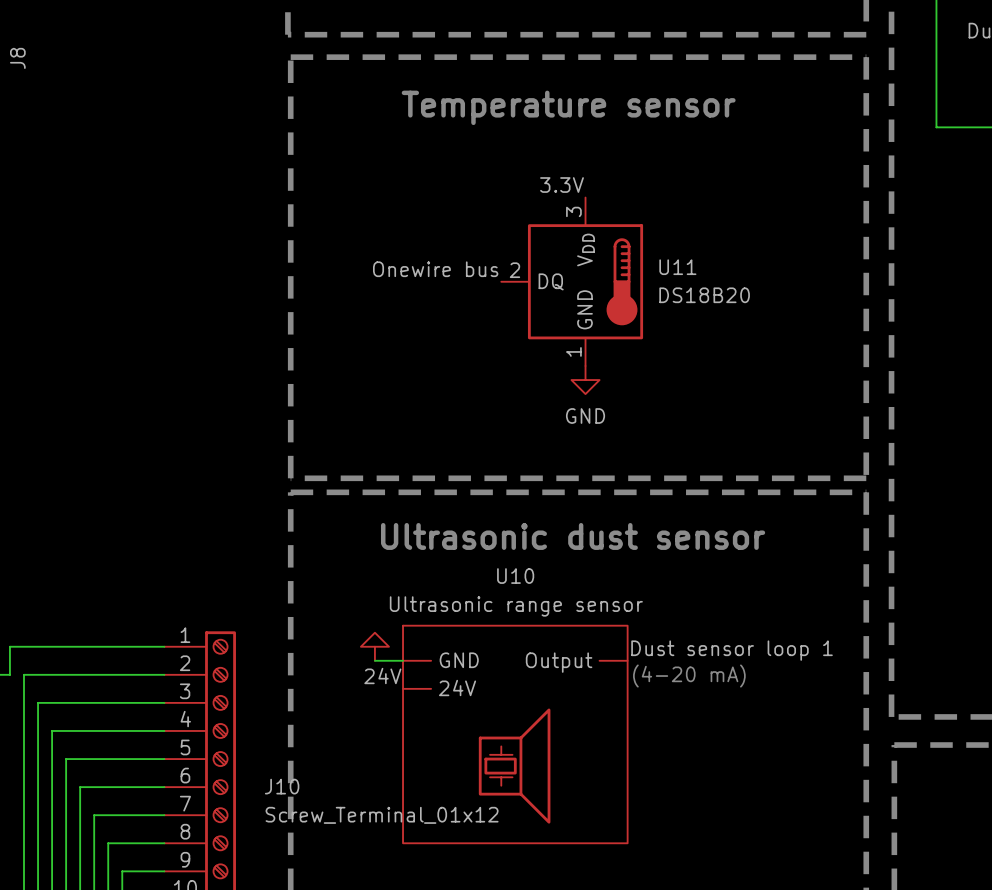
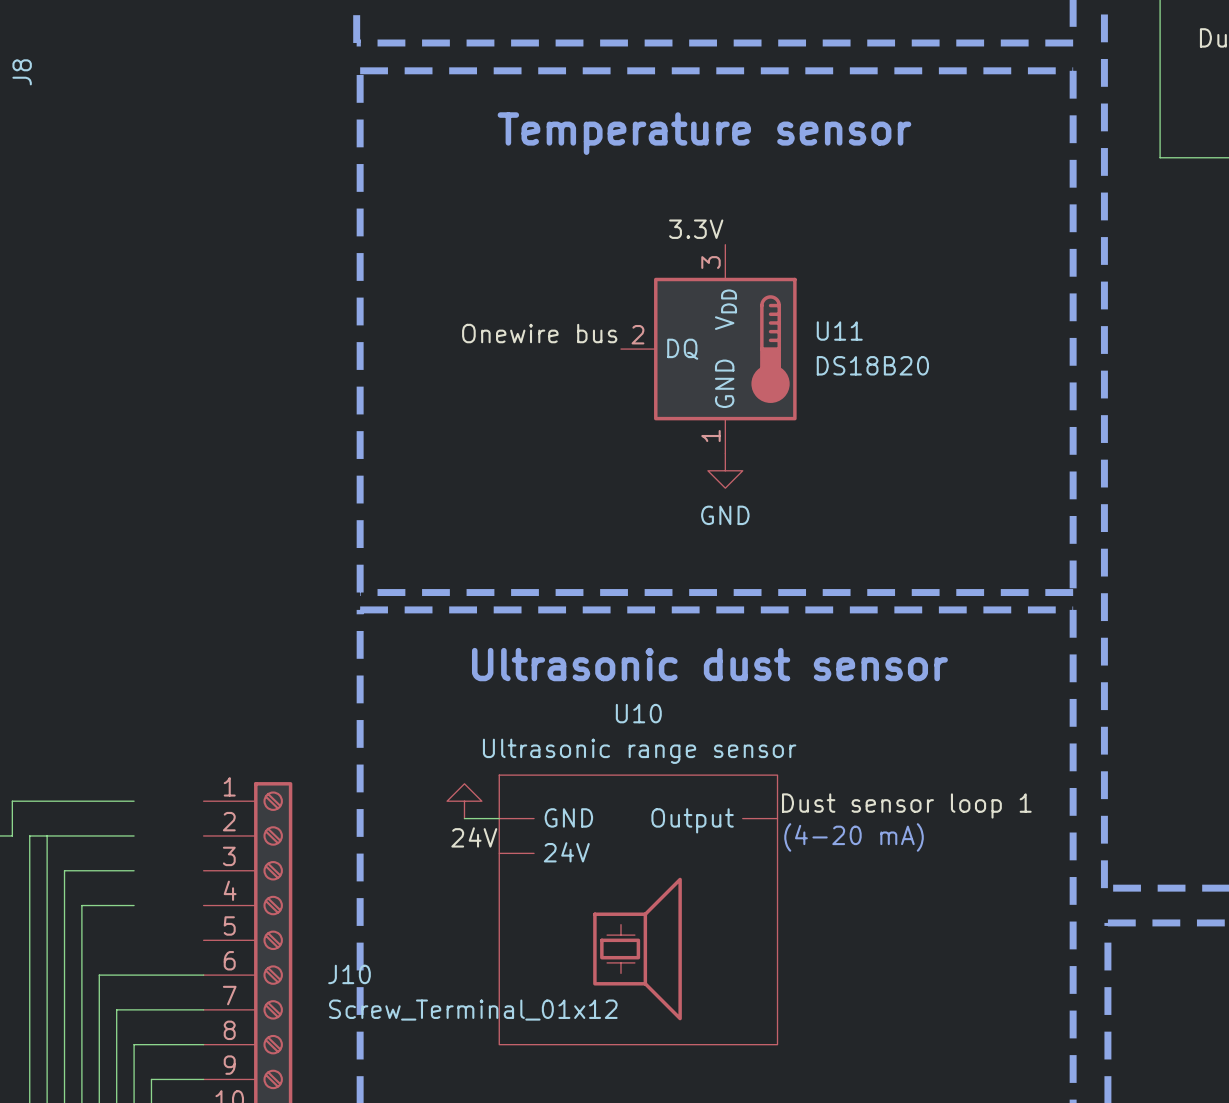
wire: (108, 646) (164, 646) -> none
wire: (108, 674) (164, 674) -> none
wire: (38, 702) (52, 702) -> (47, 870) (47, 835)
wire: (108, 702) (164, 702) -> none
wire: (52, 730) (66, 730) -> (64, 905) (64, 870)
wire: (108, 730) (164, 730) -> none
wire: (66, 759) (164, 759) -> (81, 940) (81, 905)

